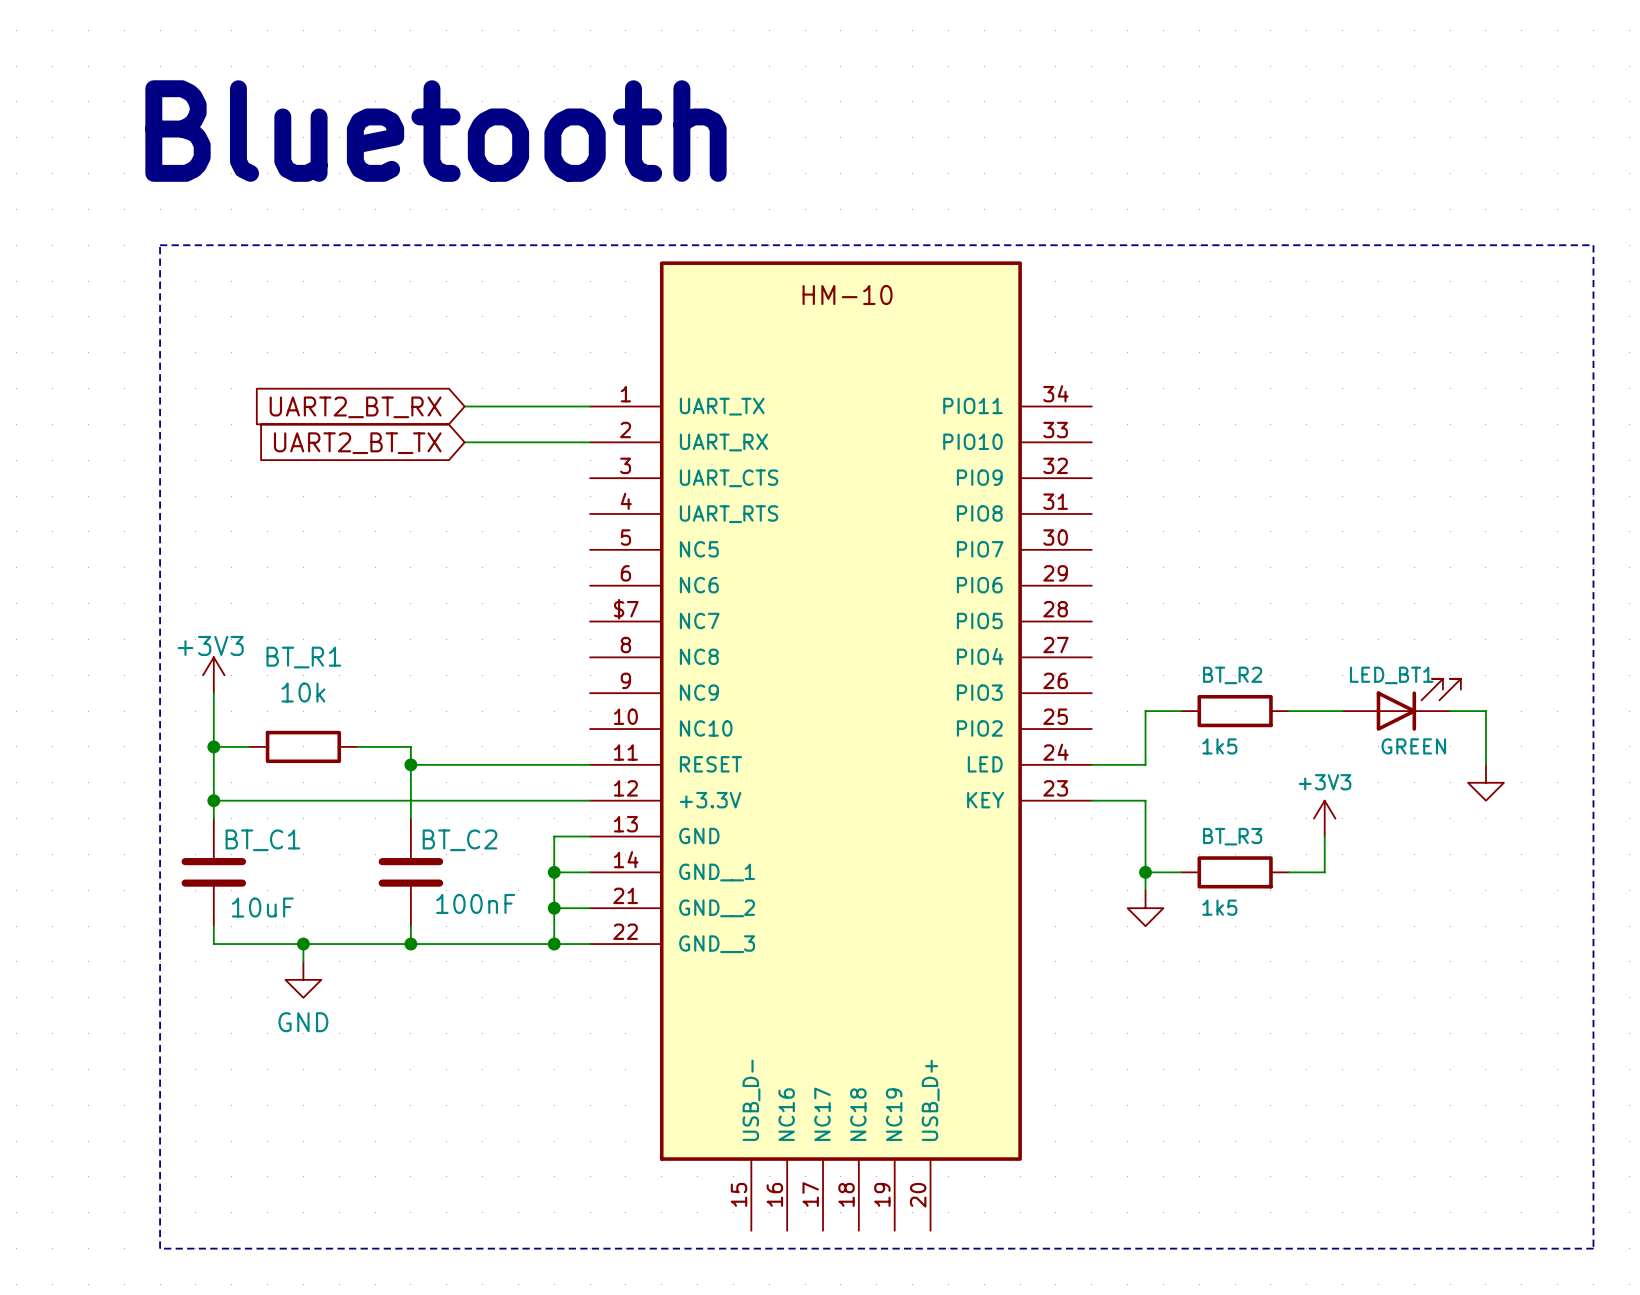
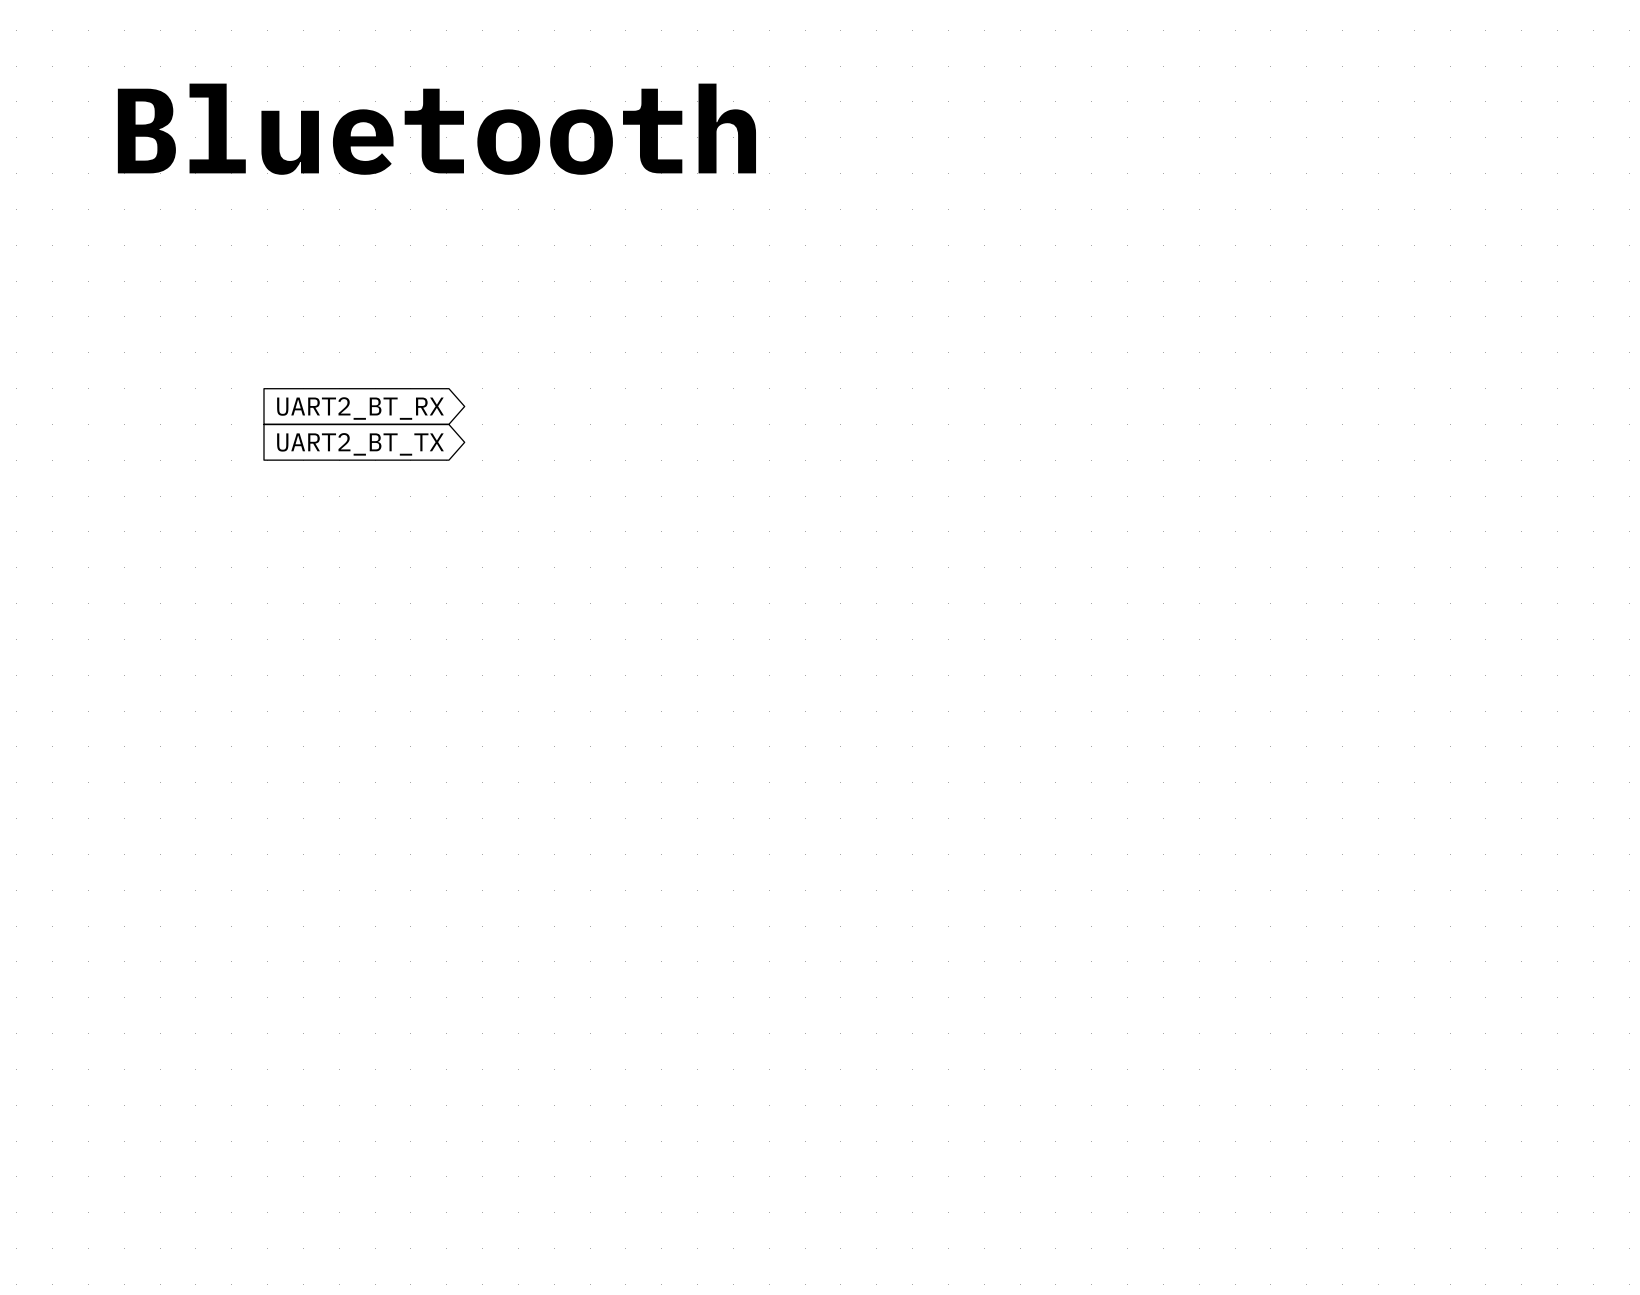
line: (160, 245) (1593, 245) (1593, 1248) (160, 1248) (160, 245) -> none
wire: (464, 406) (590, 406) -> none
wire: (464, 442) (590, 442) -> none
power symbol: +3V3 (213, 675) -> none
wire: (213, 693) (213, 818) -> none
LED_BT1: GREEN (1401, 704) -> none
wire: (1181, 711) (1145, 711) (1145, 764) (1091, 764) -> none
BT_R2: 1k5 (1235, 711) -> none
wire: (1288, 711) (1342, 711) -> none
wire: (1450, 711) (1485, 711) (1485, 764) -> none
wire: (213, 746) (249, 746) -> none
junction: (213, 746) -> none
BT_R1: 10k (303, 746) -> none
wire: (357, 746) (410, 746) (410, 818) -> none
part: (840, 746) -> none
wire: (410, 764) (590, 764) -> none
junction: (410, 764) -> none
power symbol: (1485, 782) -> none
wire: (213, 800) (590, 800) -> none
junction: (213, 800) -> none
wire: (1091, 800) (1145, 800) (1145, 890) -> none
power symbol: +3V3 (1324, 818) -> none
wire: (590, 836) (554, 836) (554, 944) -> none
wire: (1324, 836) (1324, 872) (1288, 872) -> none
BT_C1: 10uF (213, 872) -> none
BT_C2: 100nF (410, 872) -> none
wire: (554, 872) (590, 872) -> none
junction: (554, 872) -> none
wire: (1145, 872) (1181, 872) -> none
junction: (1145, 872) -> none
BT_R3: 1k5 (1235, 872) -> none
wire: (554, 908) (590, 908) -> none
junction: (554, 908) -> none
power symbol: (1145, 908) -> none
wire: (213, 926) (213, 944) (590, 944) -> none
wire: (410, 926) (410, 944) -> none
wire: (303, 944) (303, 961) -> none
junction: (303, 944) -> none
junction: (410, 944) -> none
junction: (554, 944) -> none
power symbol: GND (303, 979) -> none

